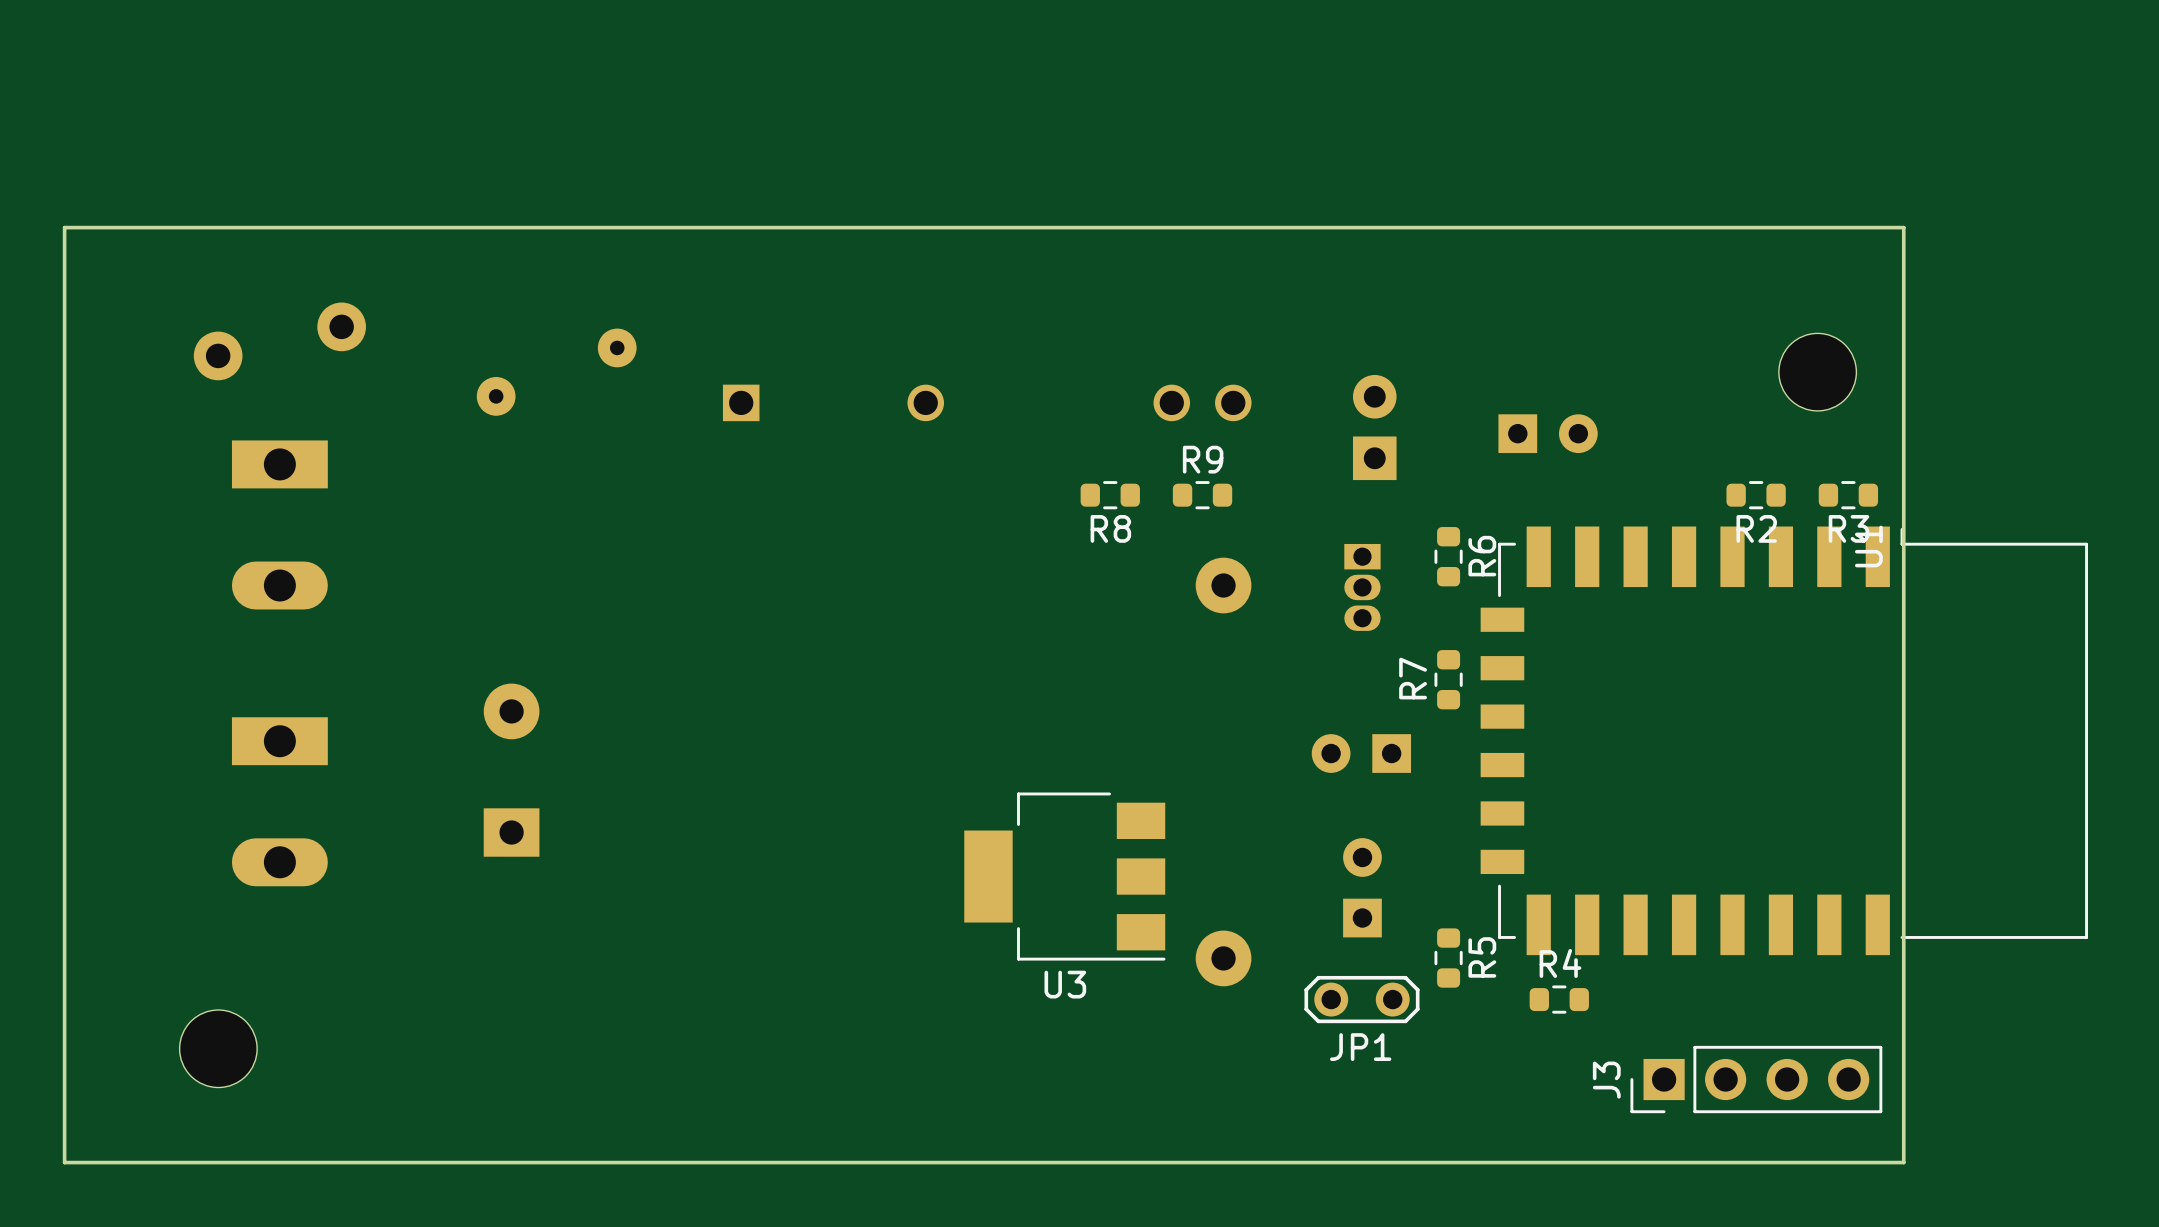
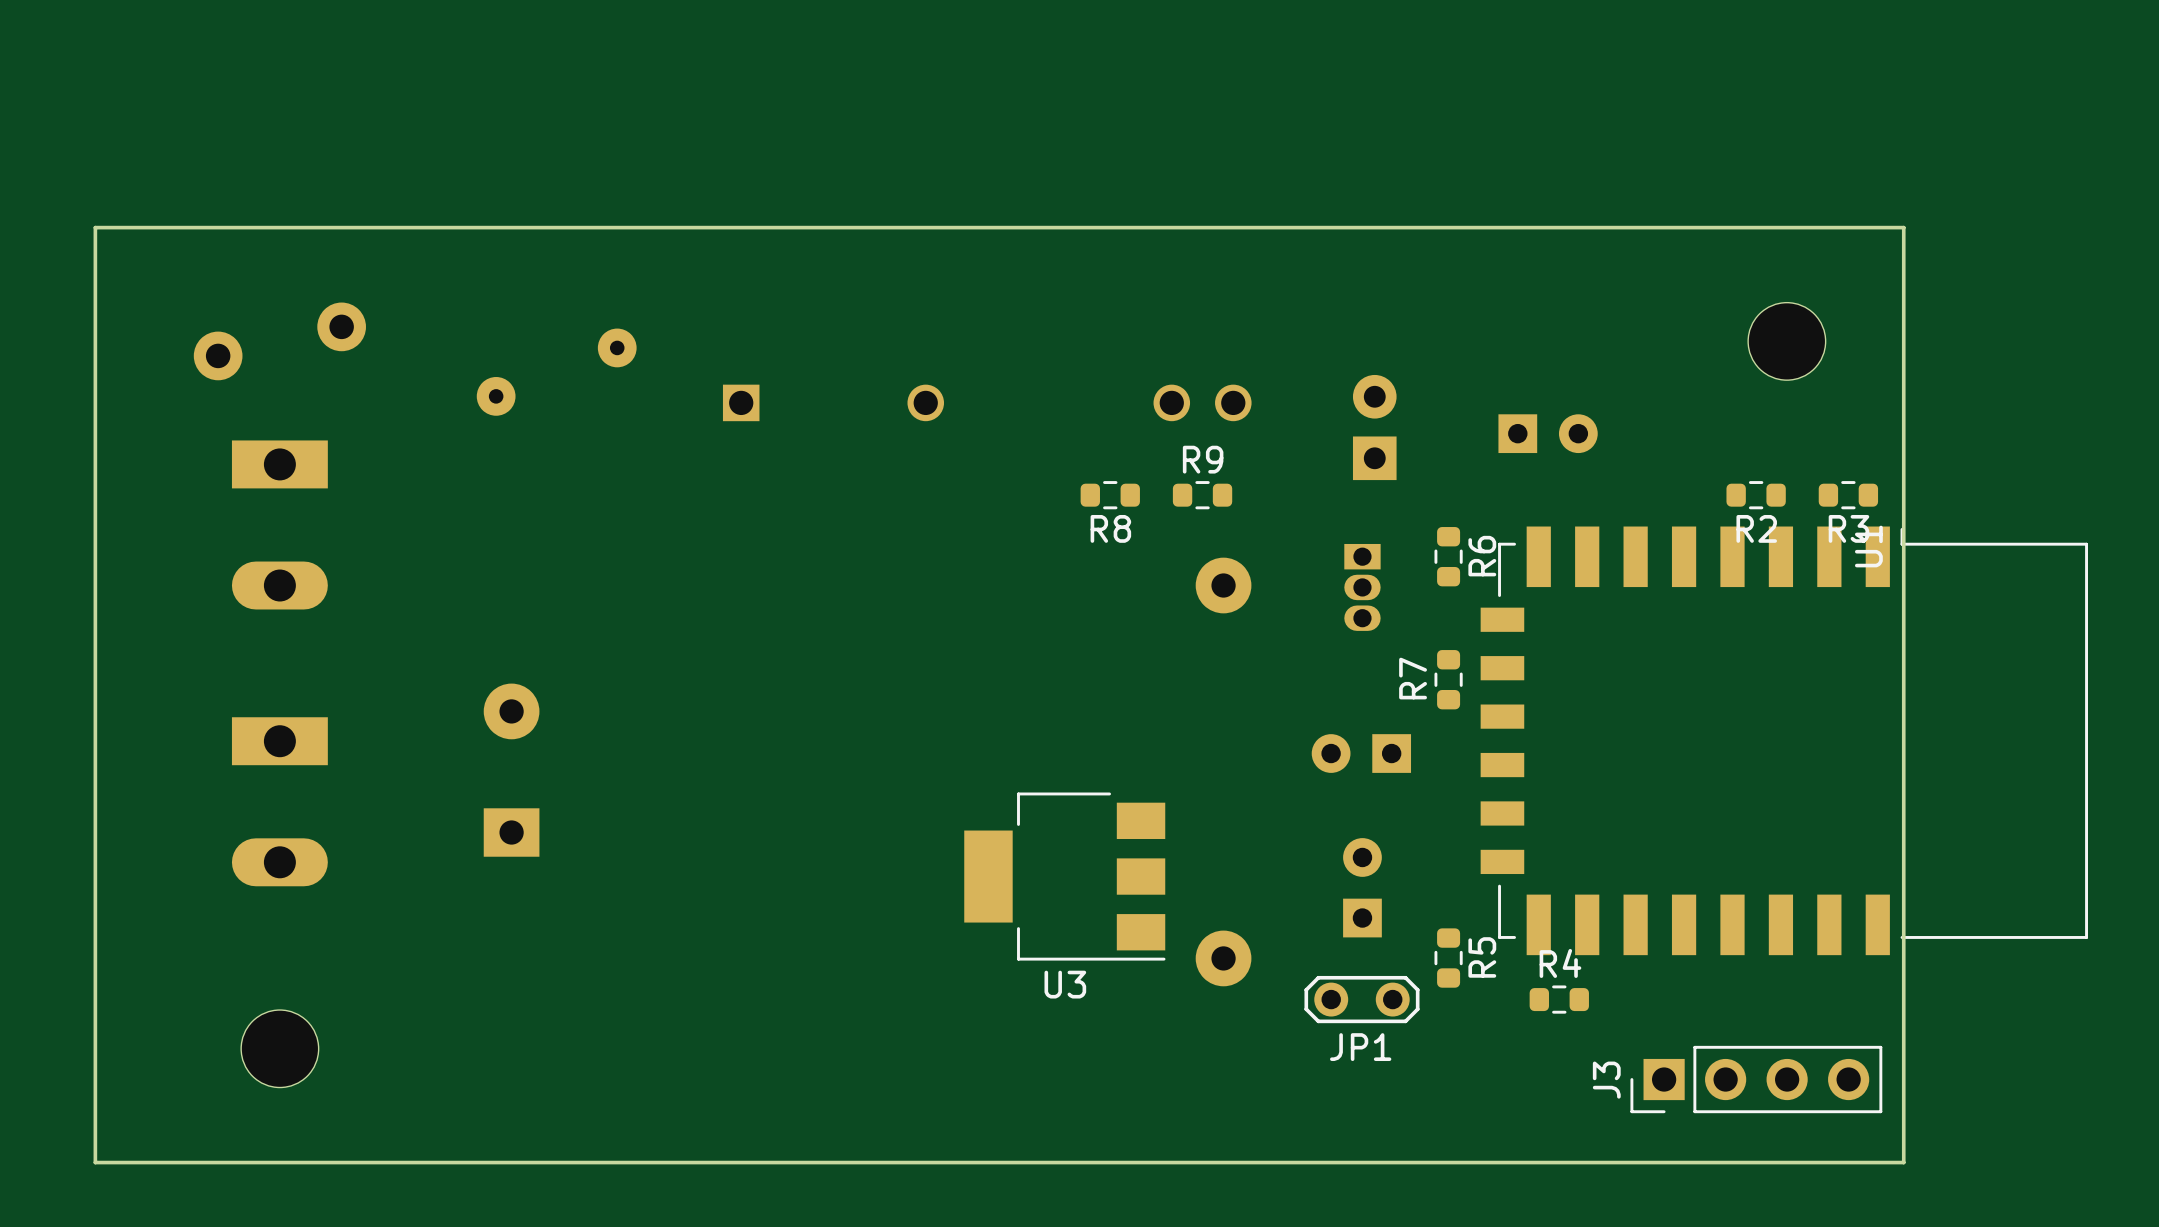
board edge: (95, 227) (64, 227) (64, 1162) (95, 1162) -> (95, 227) (95, 1162)
part position: (1817, 372) -> (1786, 341)
part position: (218, 1048) -> (279, 1048)

